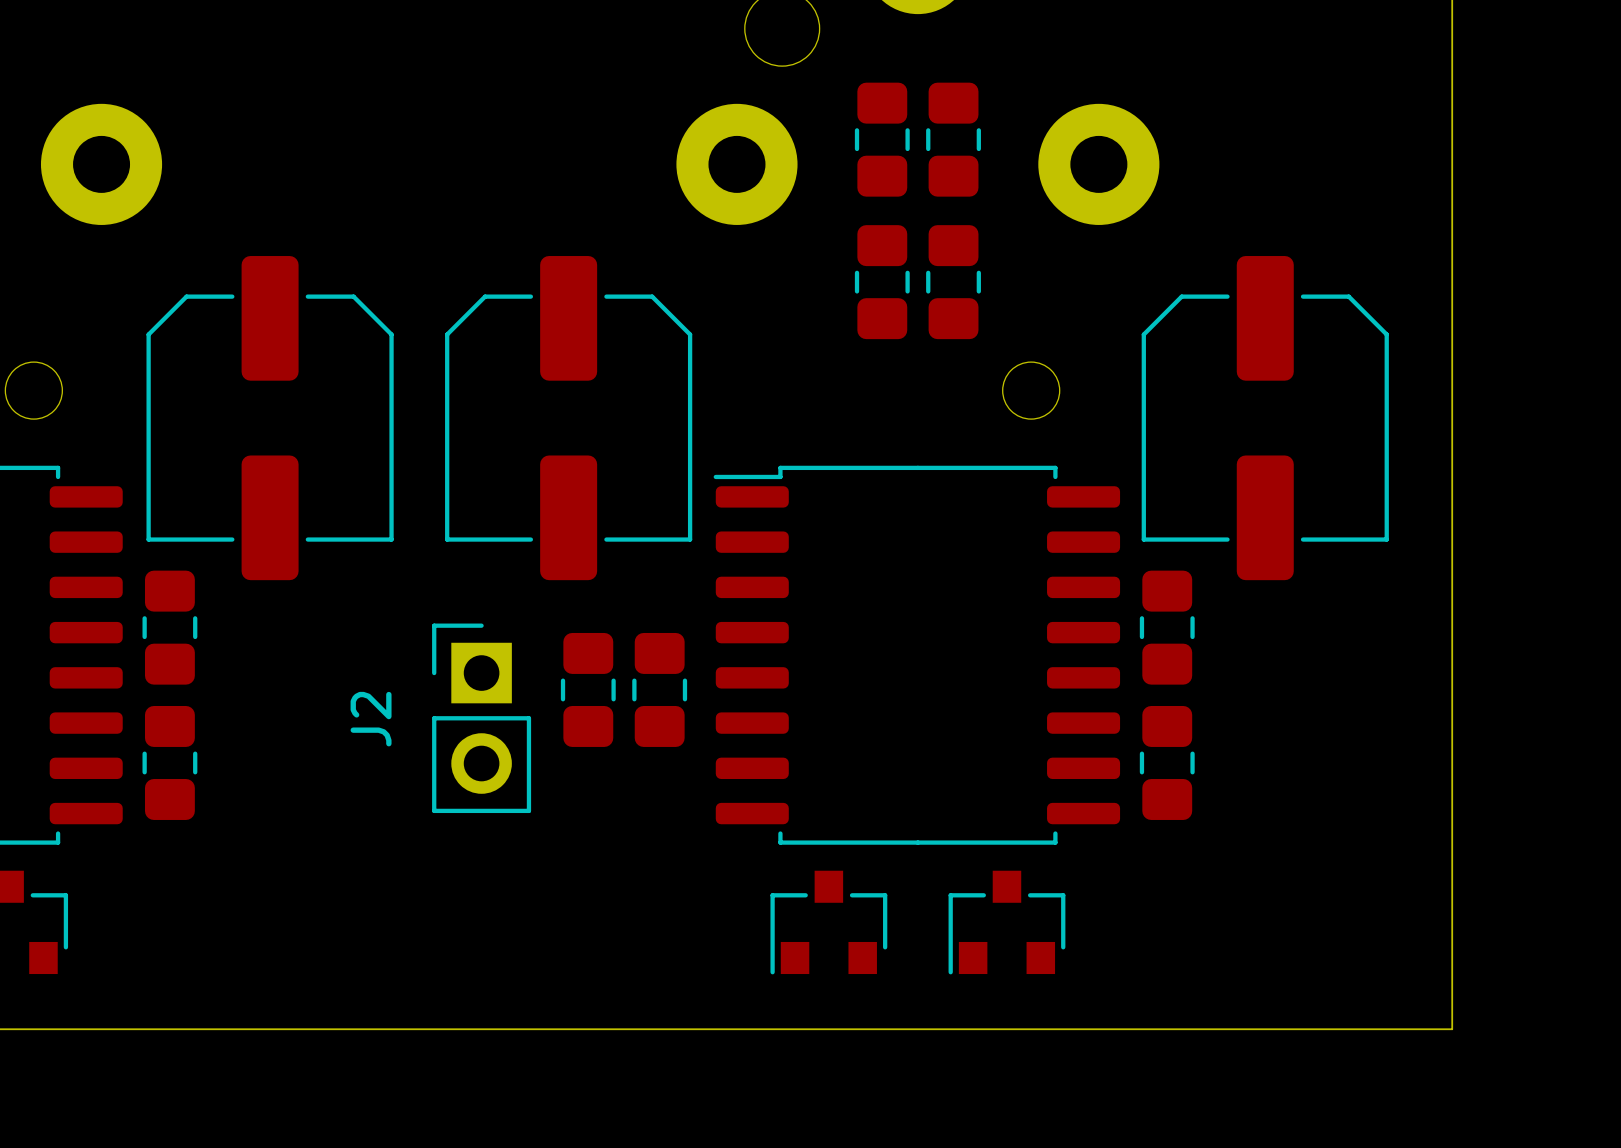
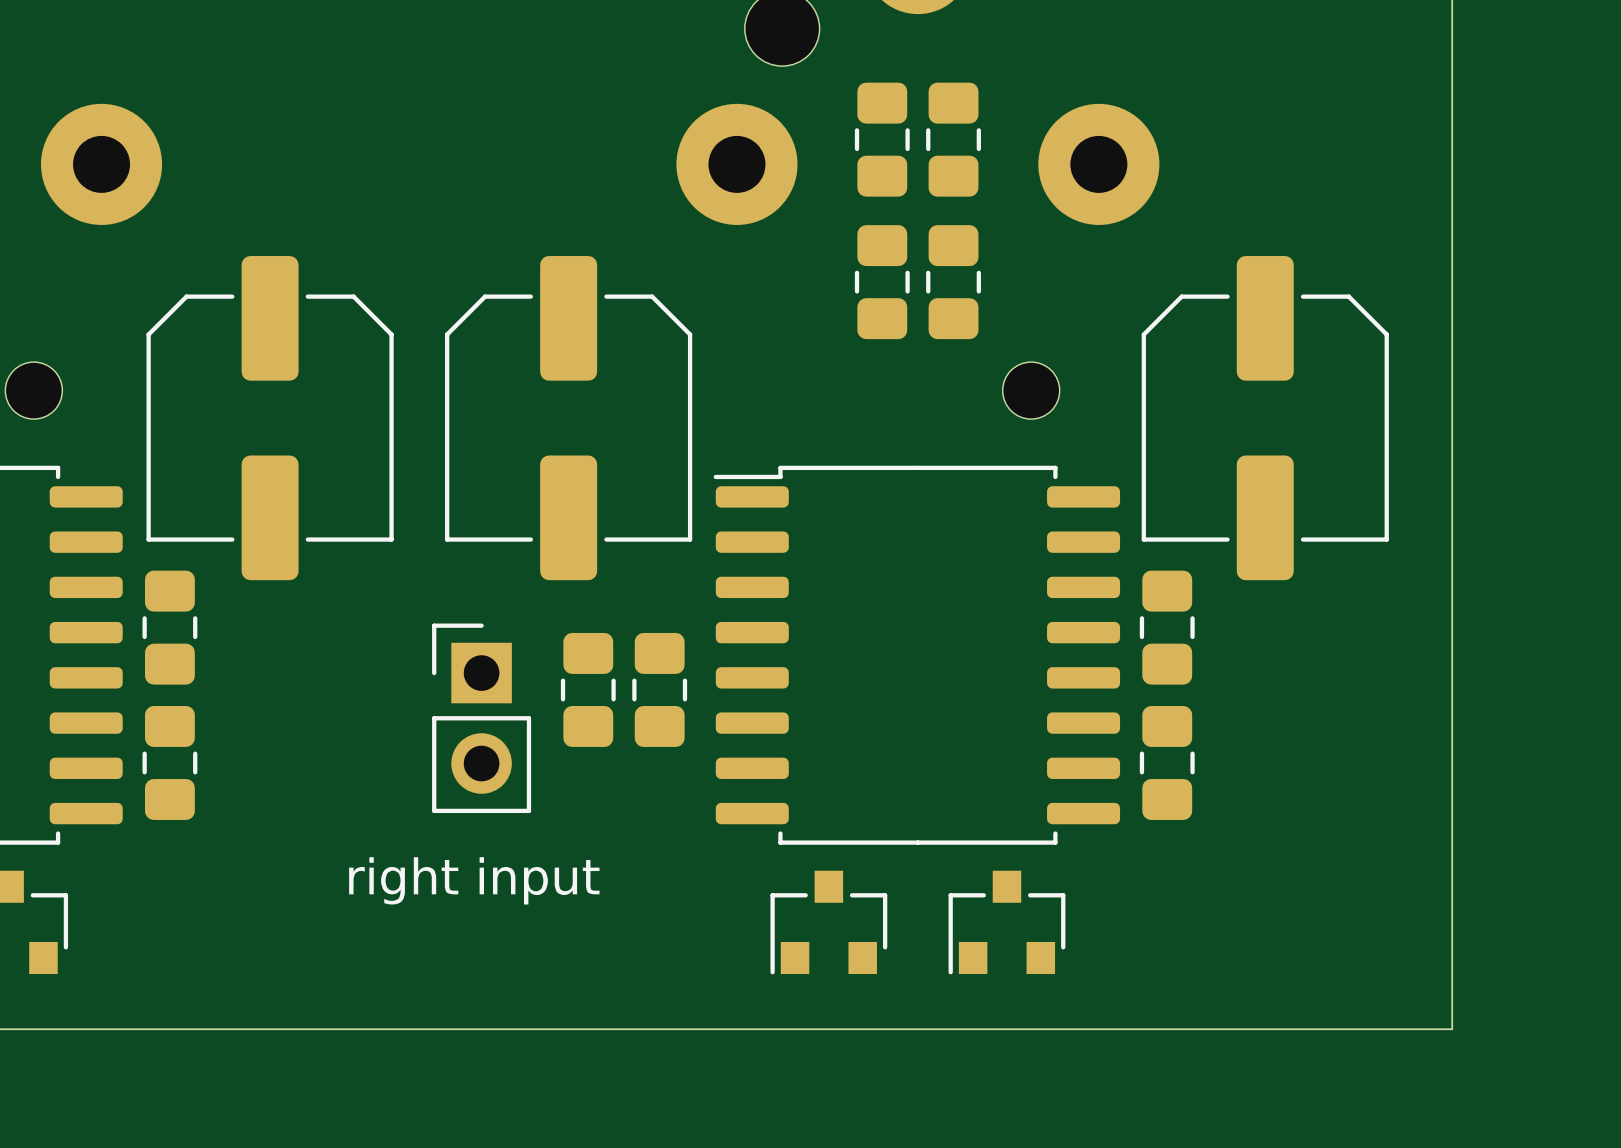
J2 name: J2 (371, 719) -> none
text: none -> right input (474, 880)

